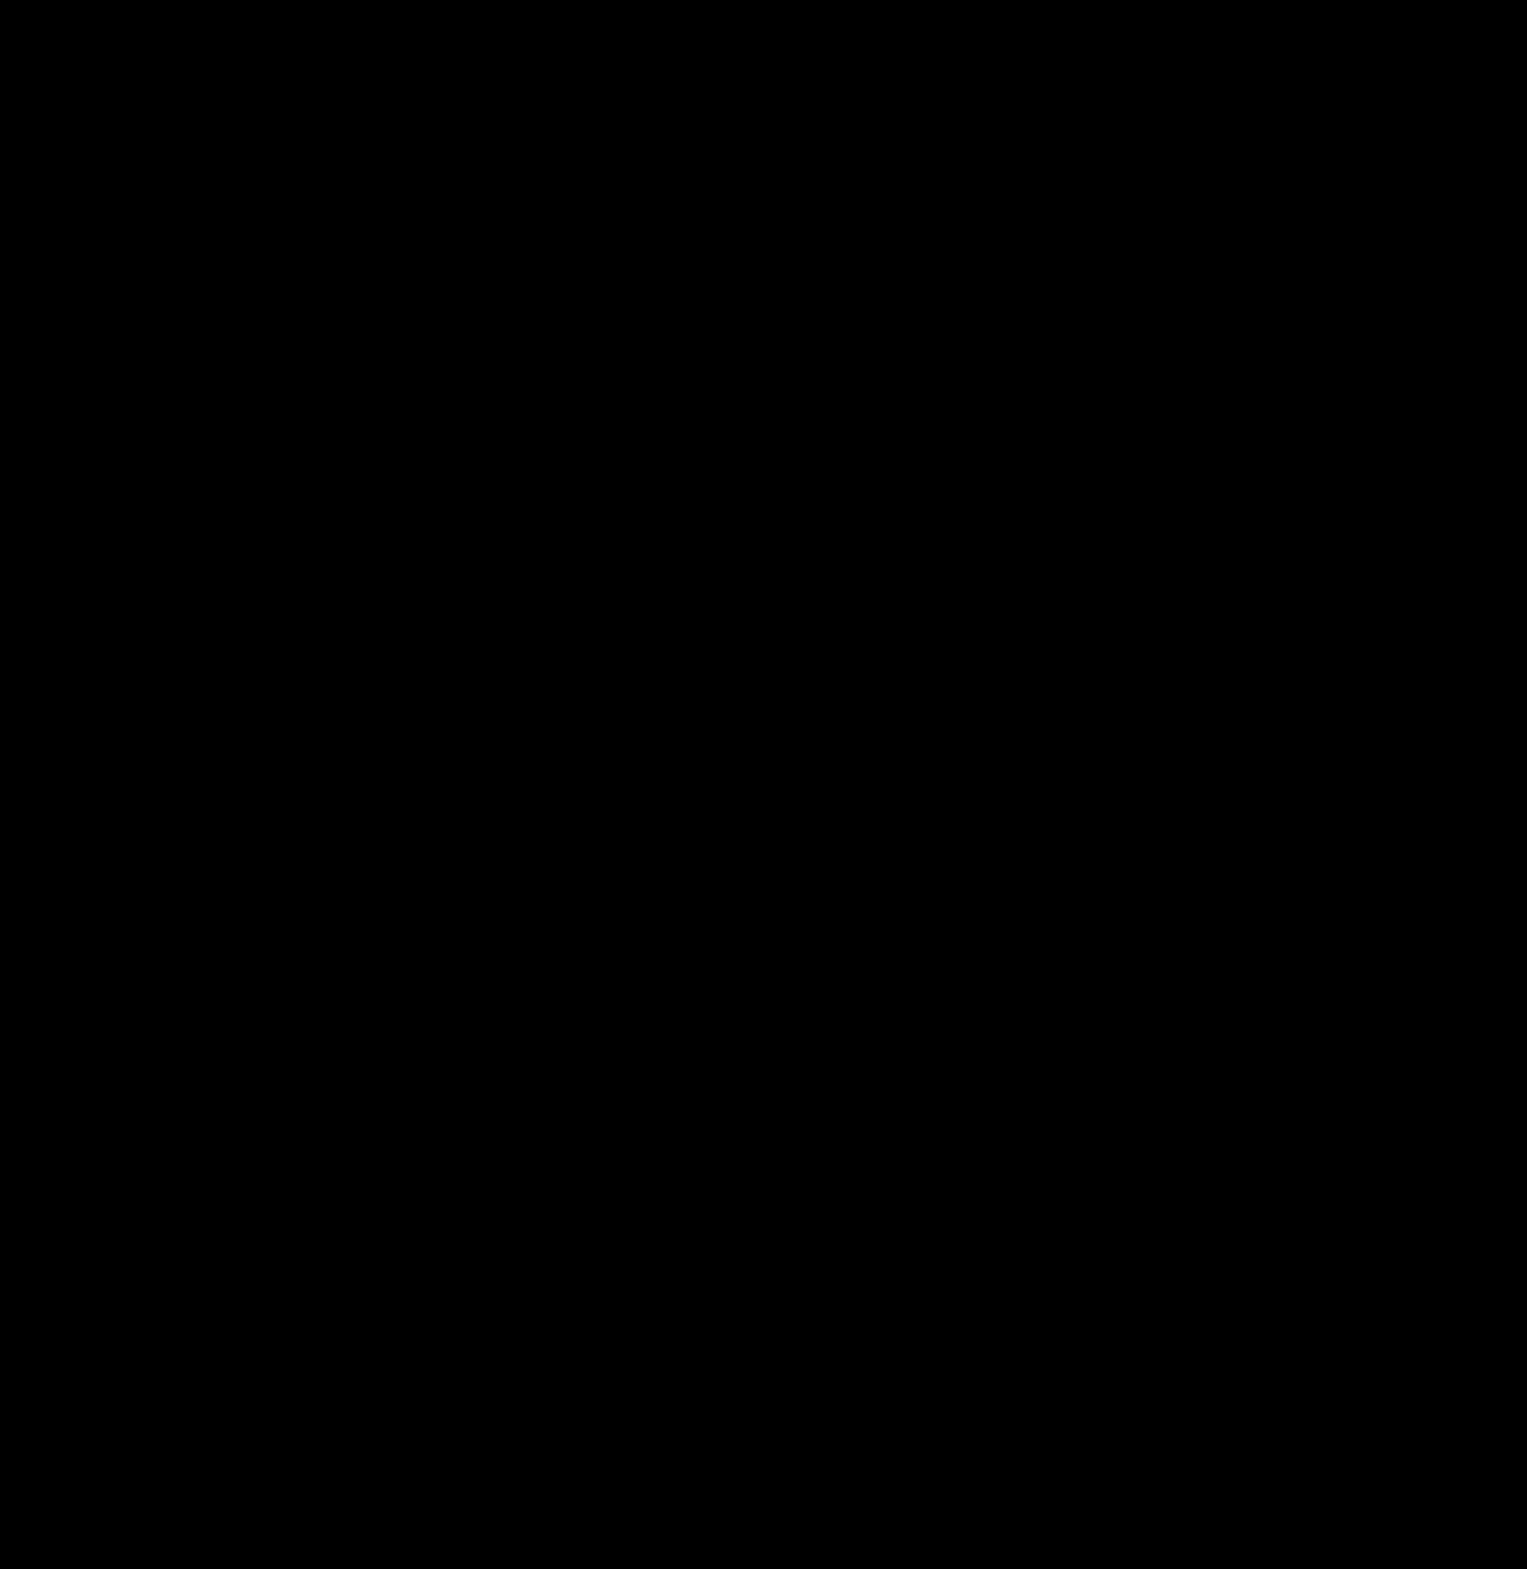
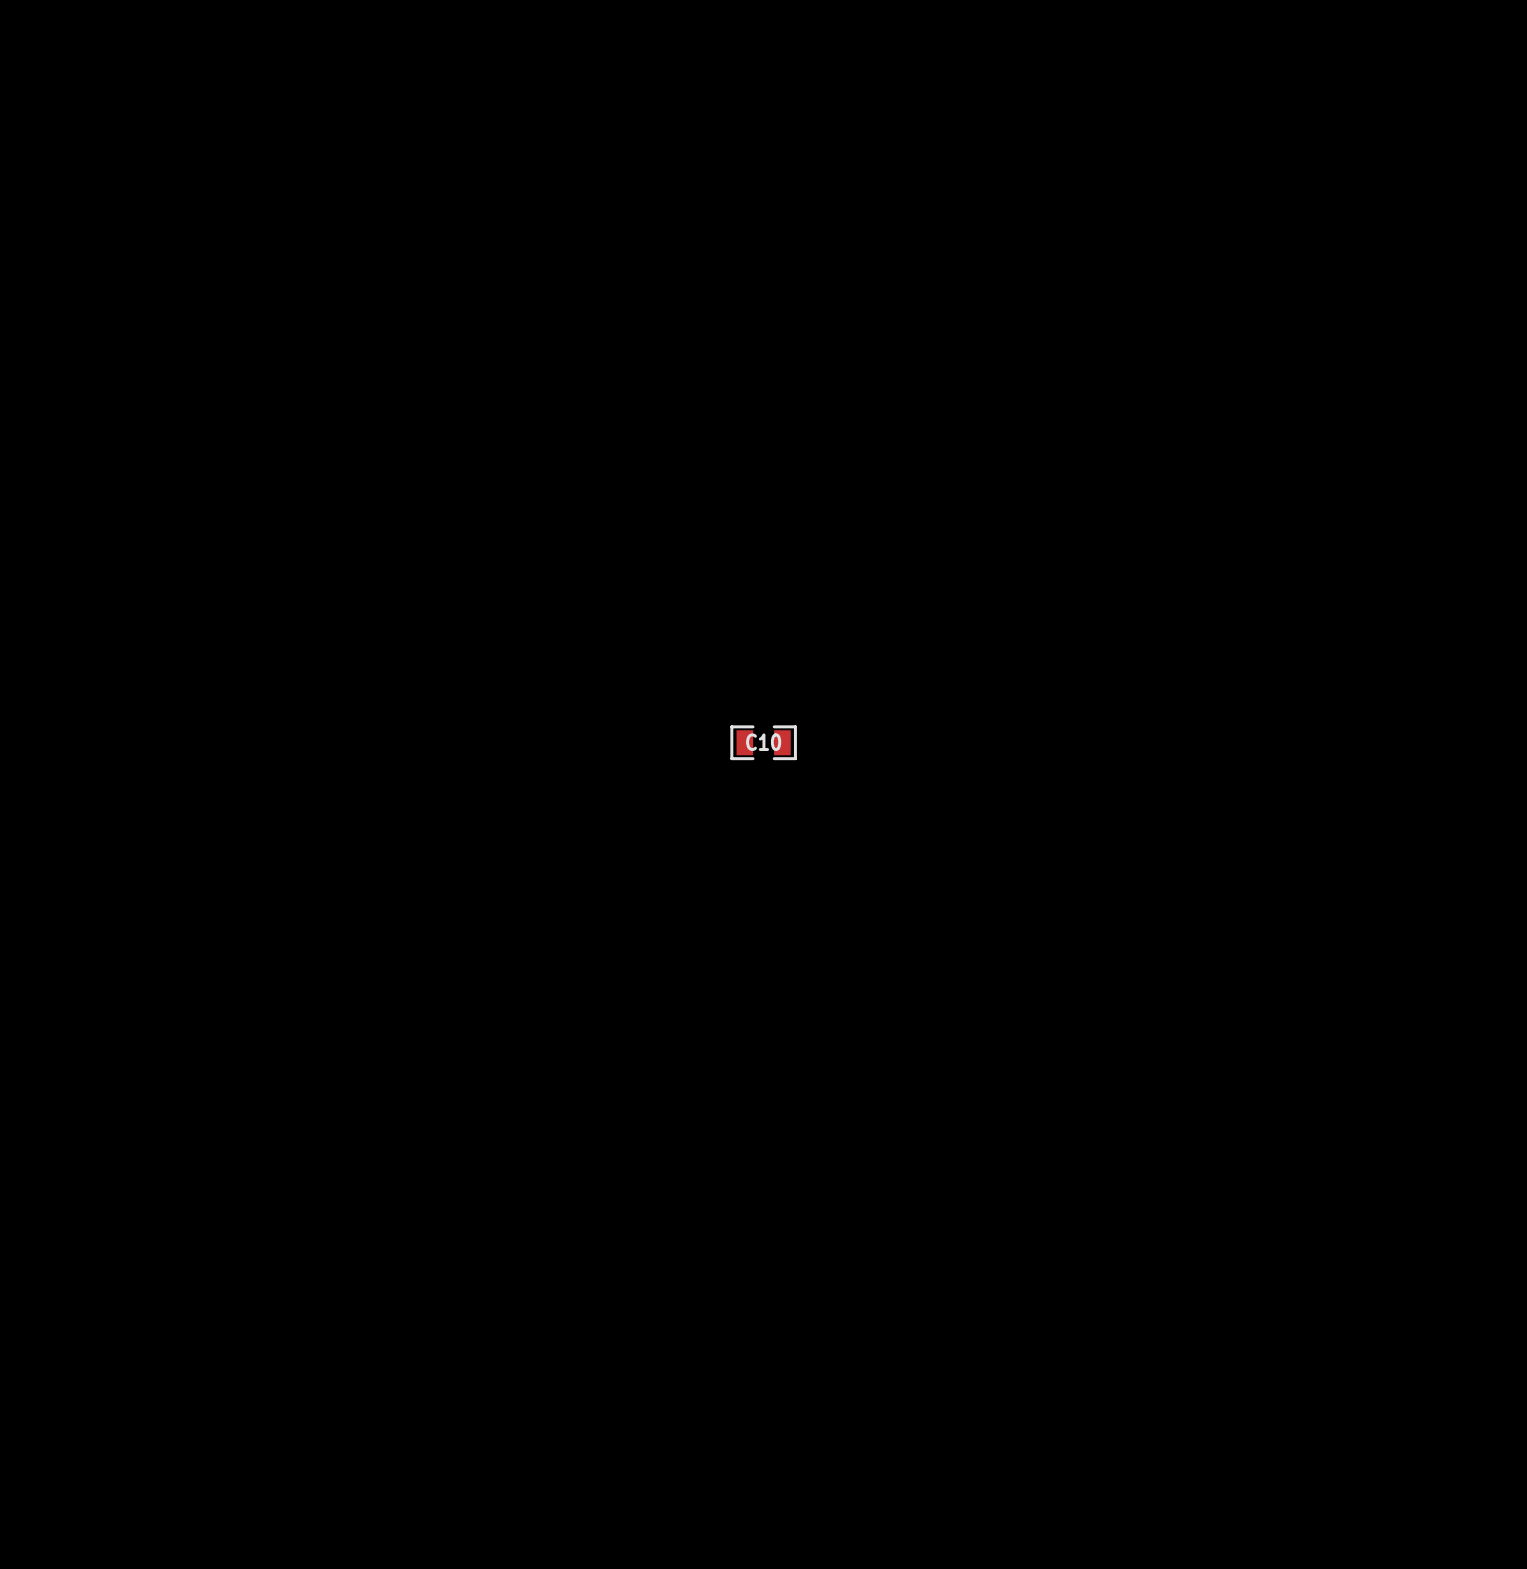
C10: none -> (763, 742)

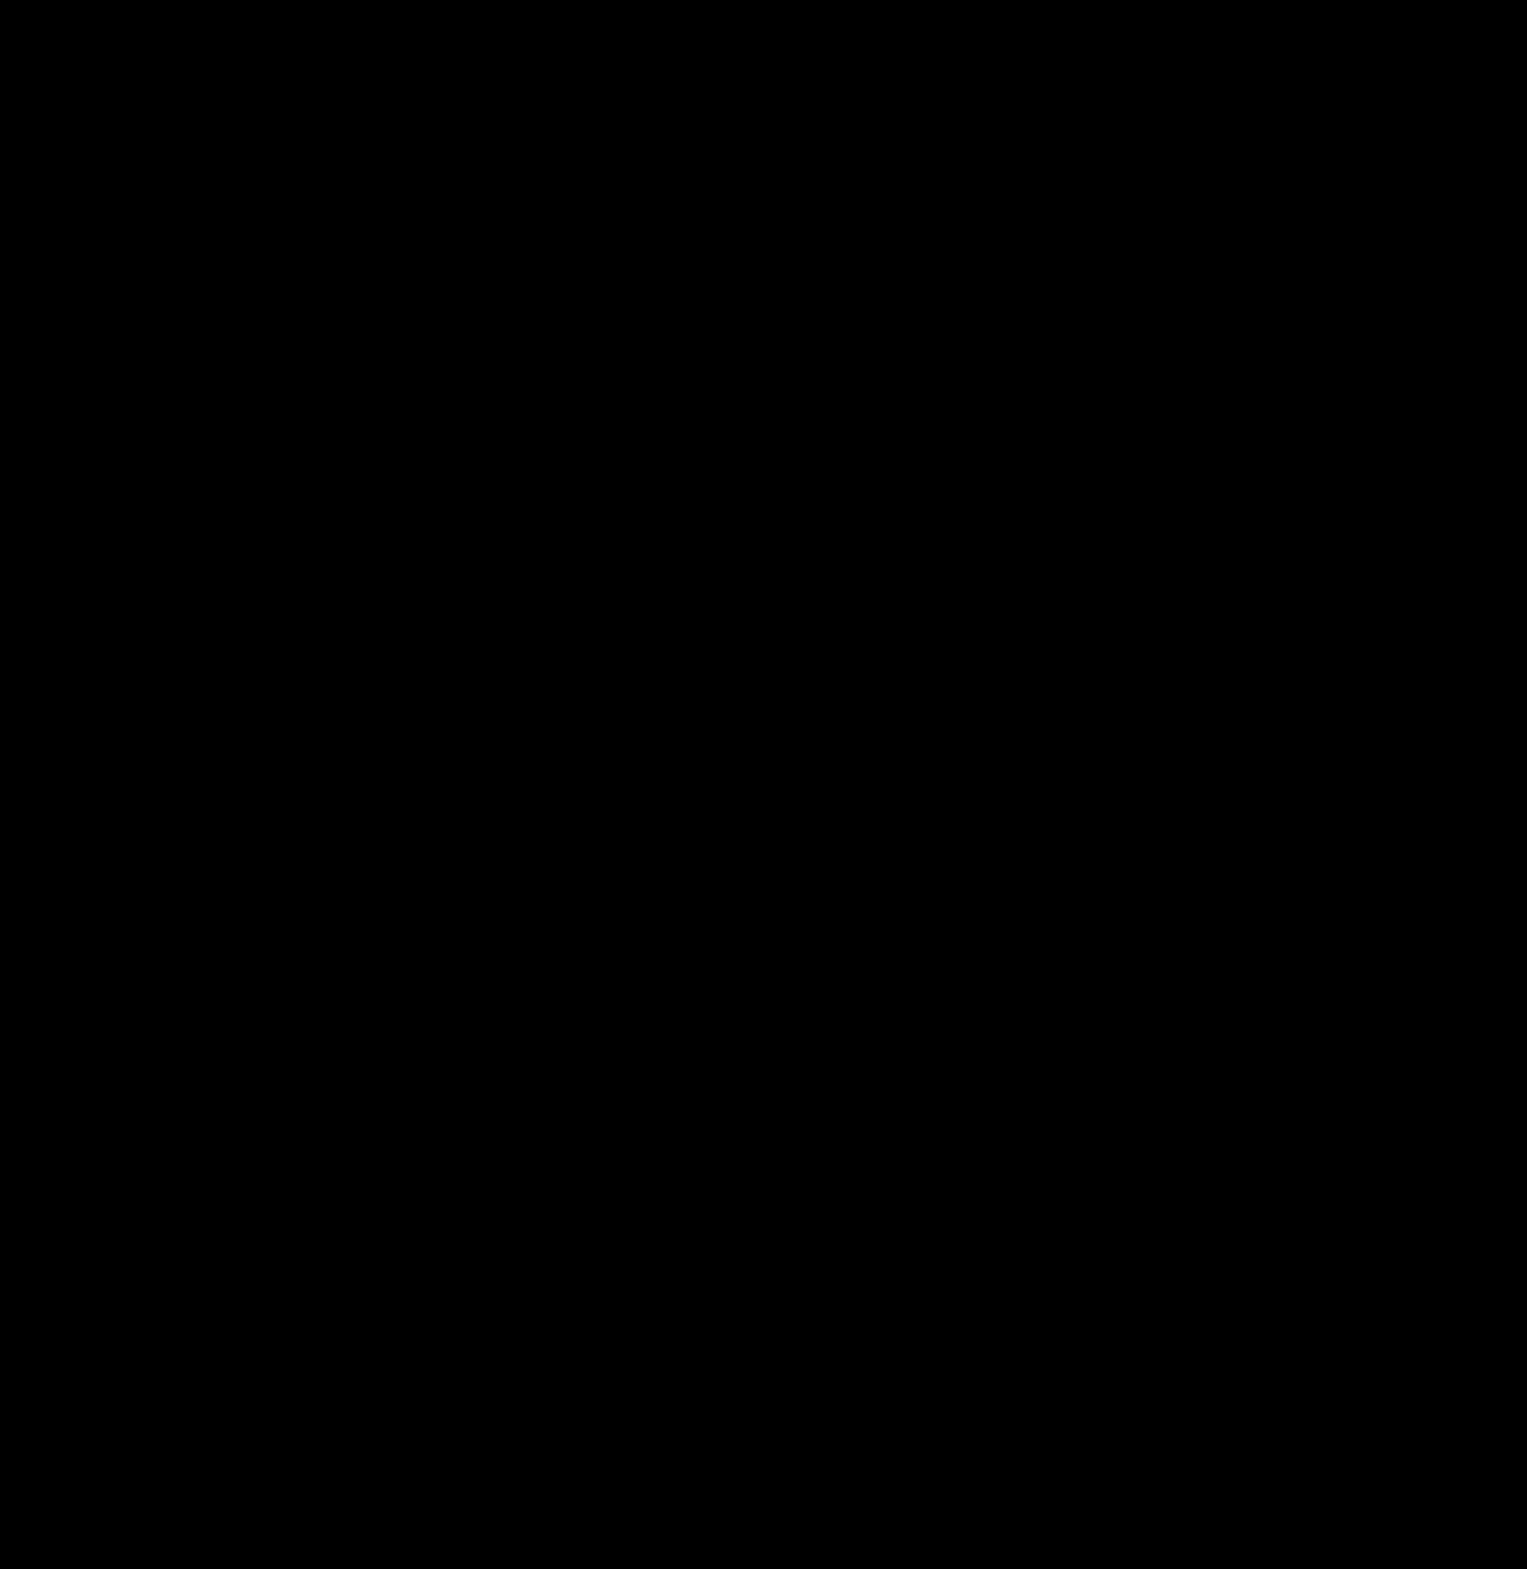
C10: (763, 742) -> none

